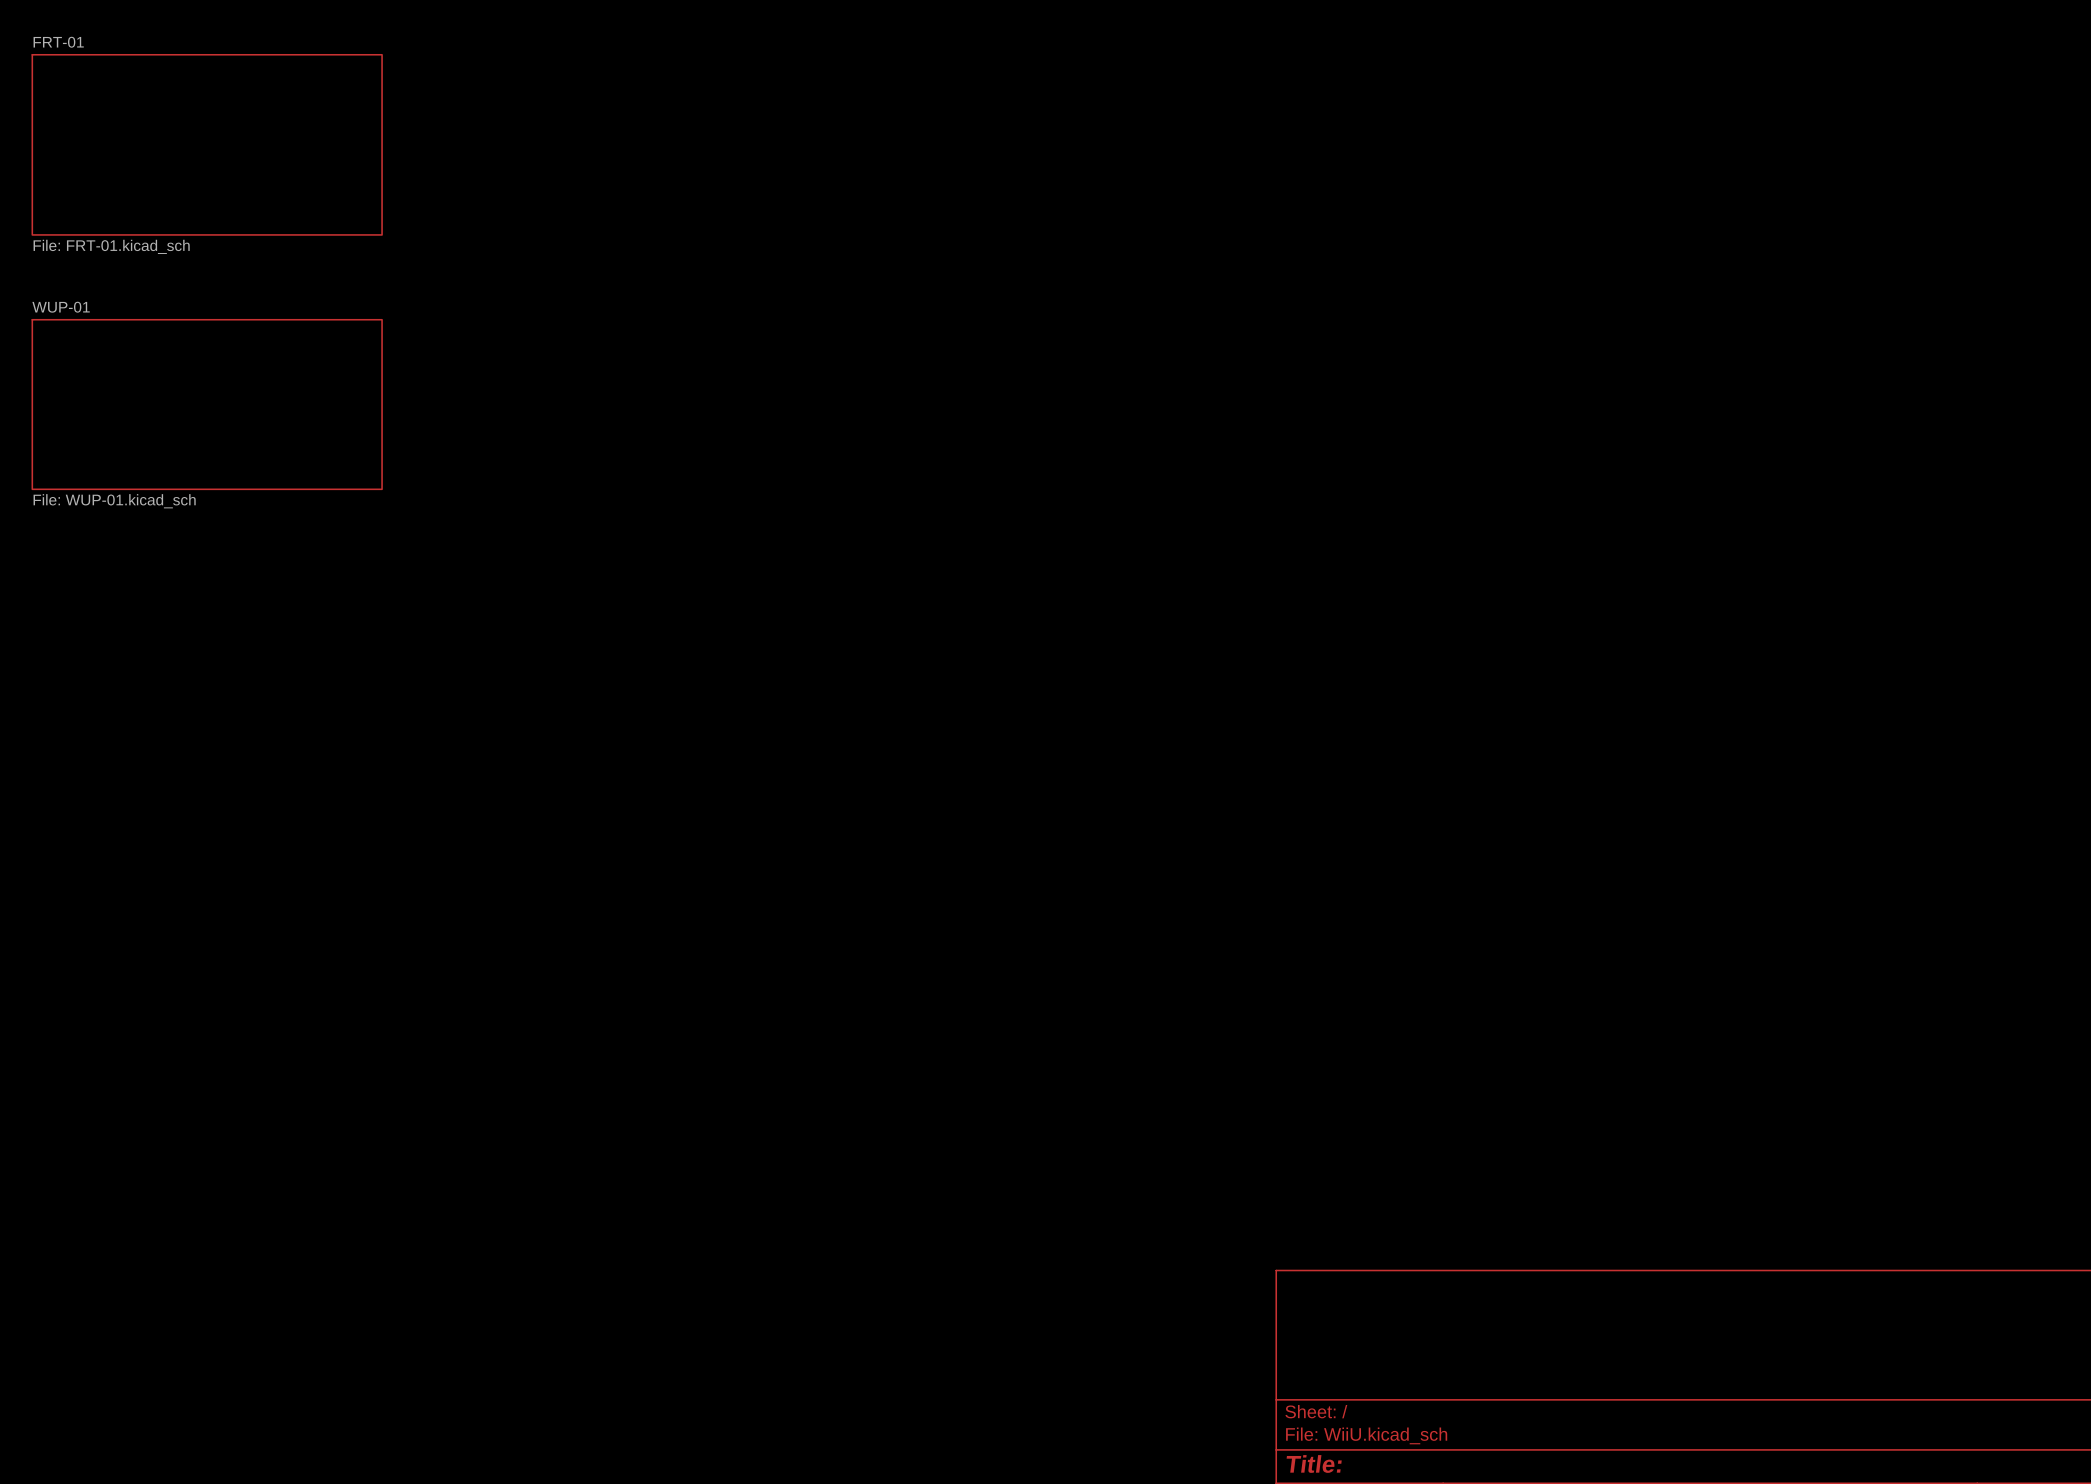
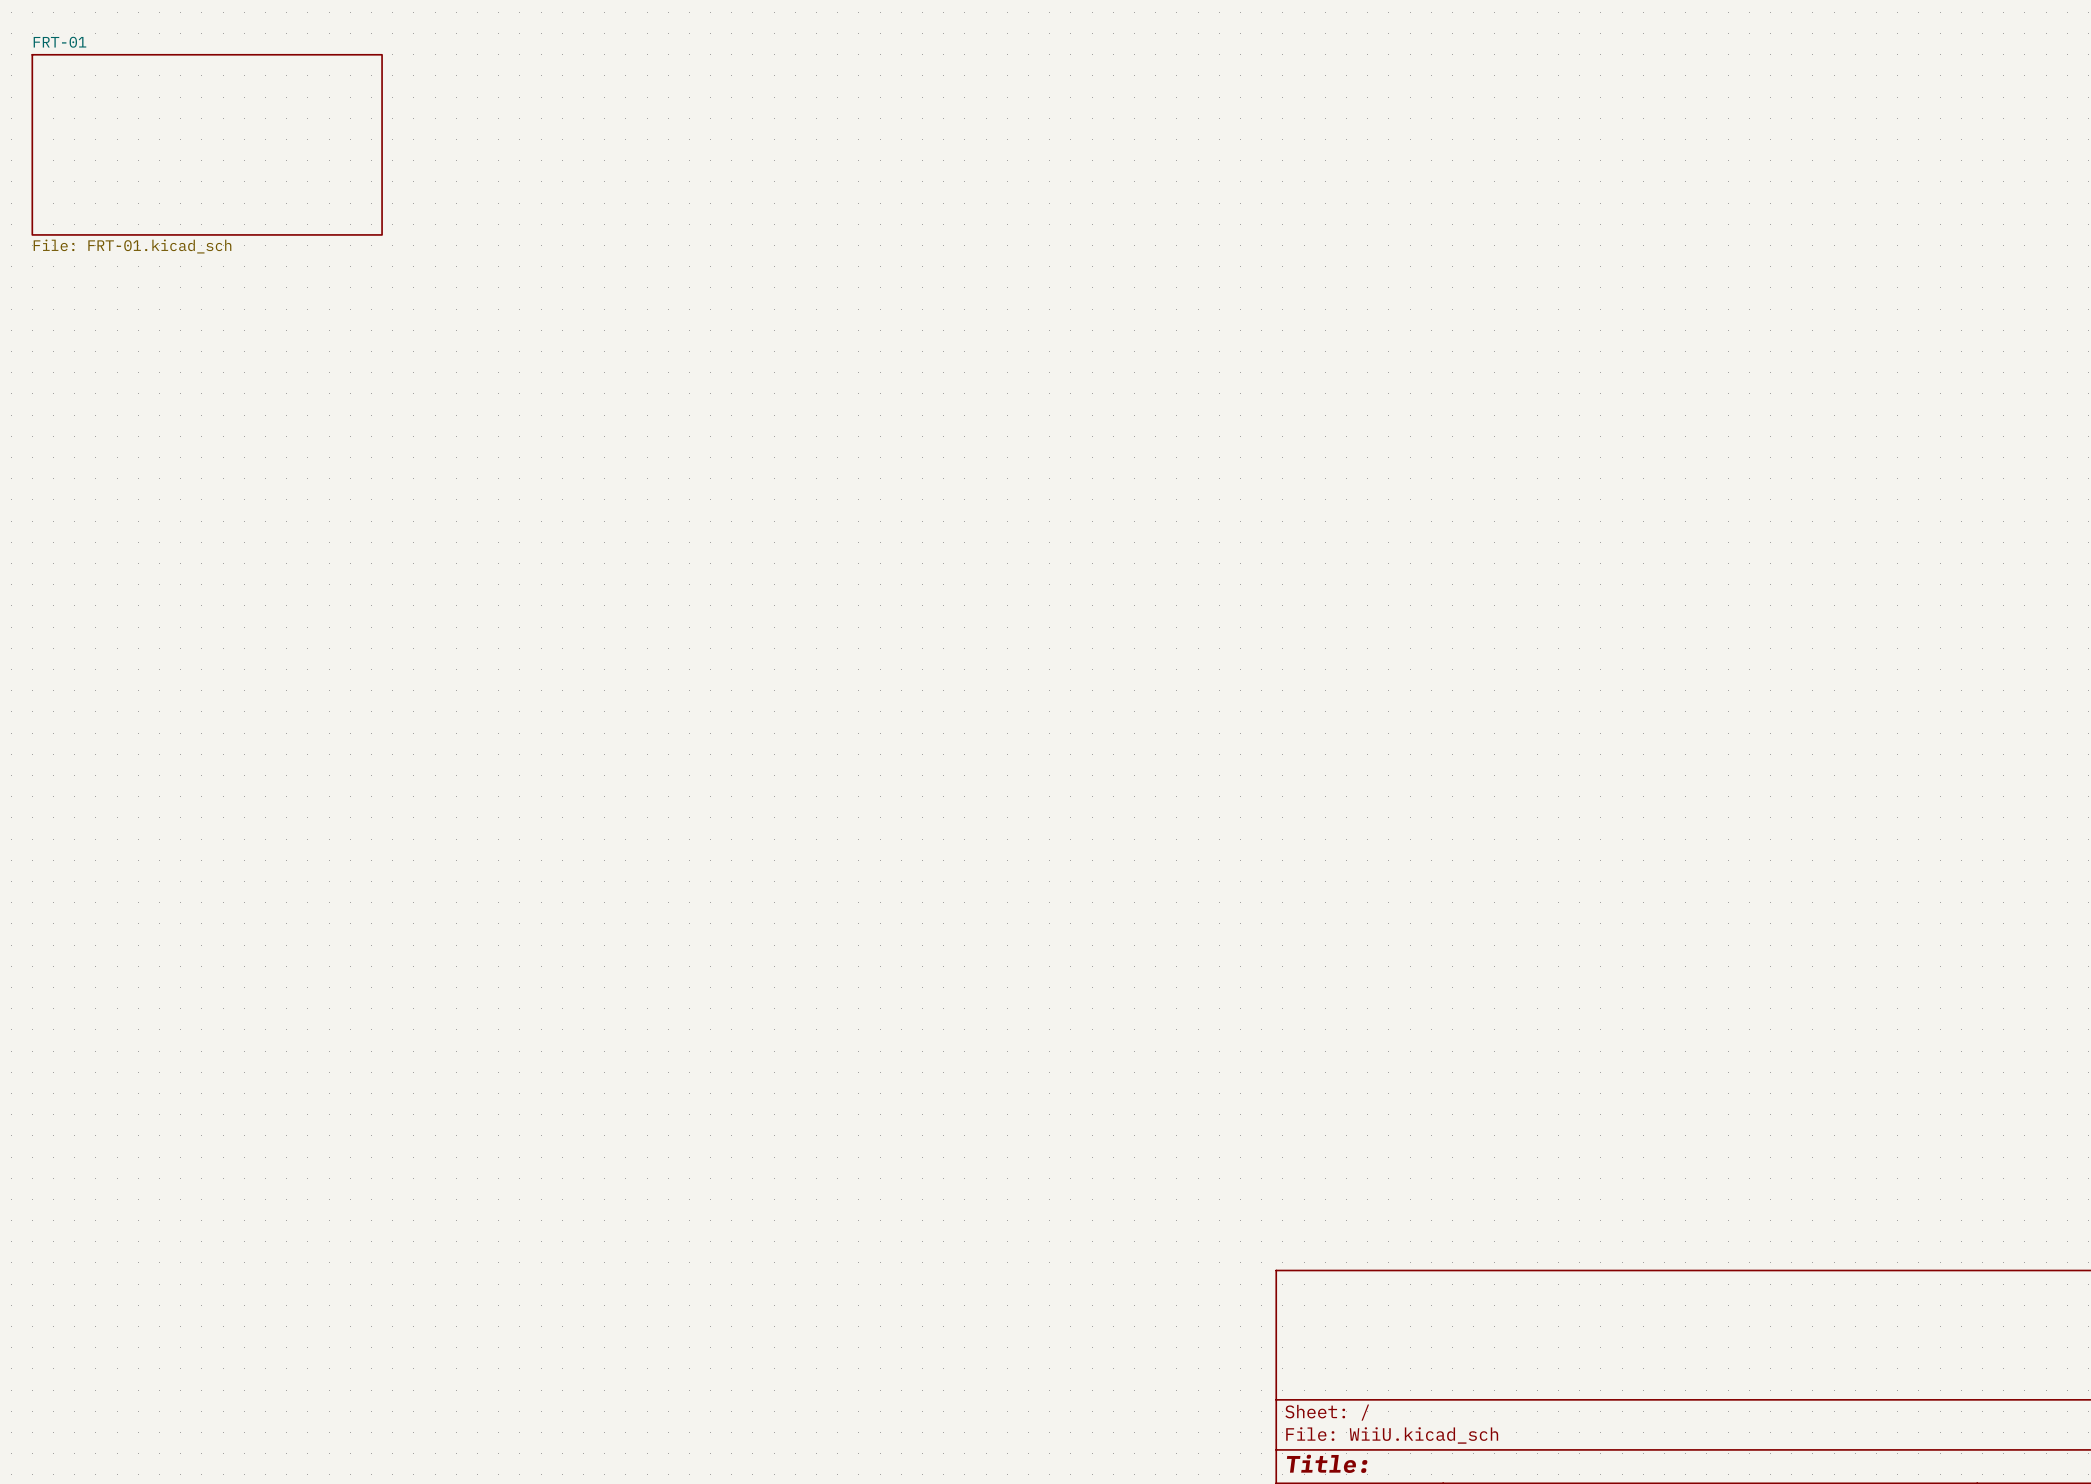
sheet WUP-01: File: WUP-01.kicad_sch (207, 404) -> none

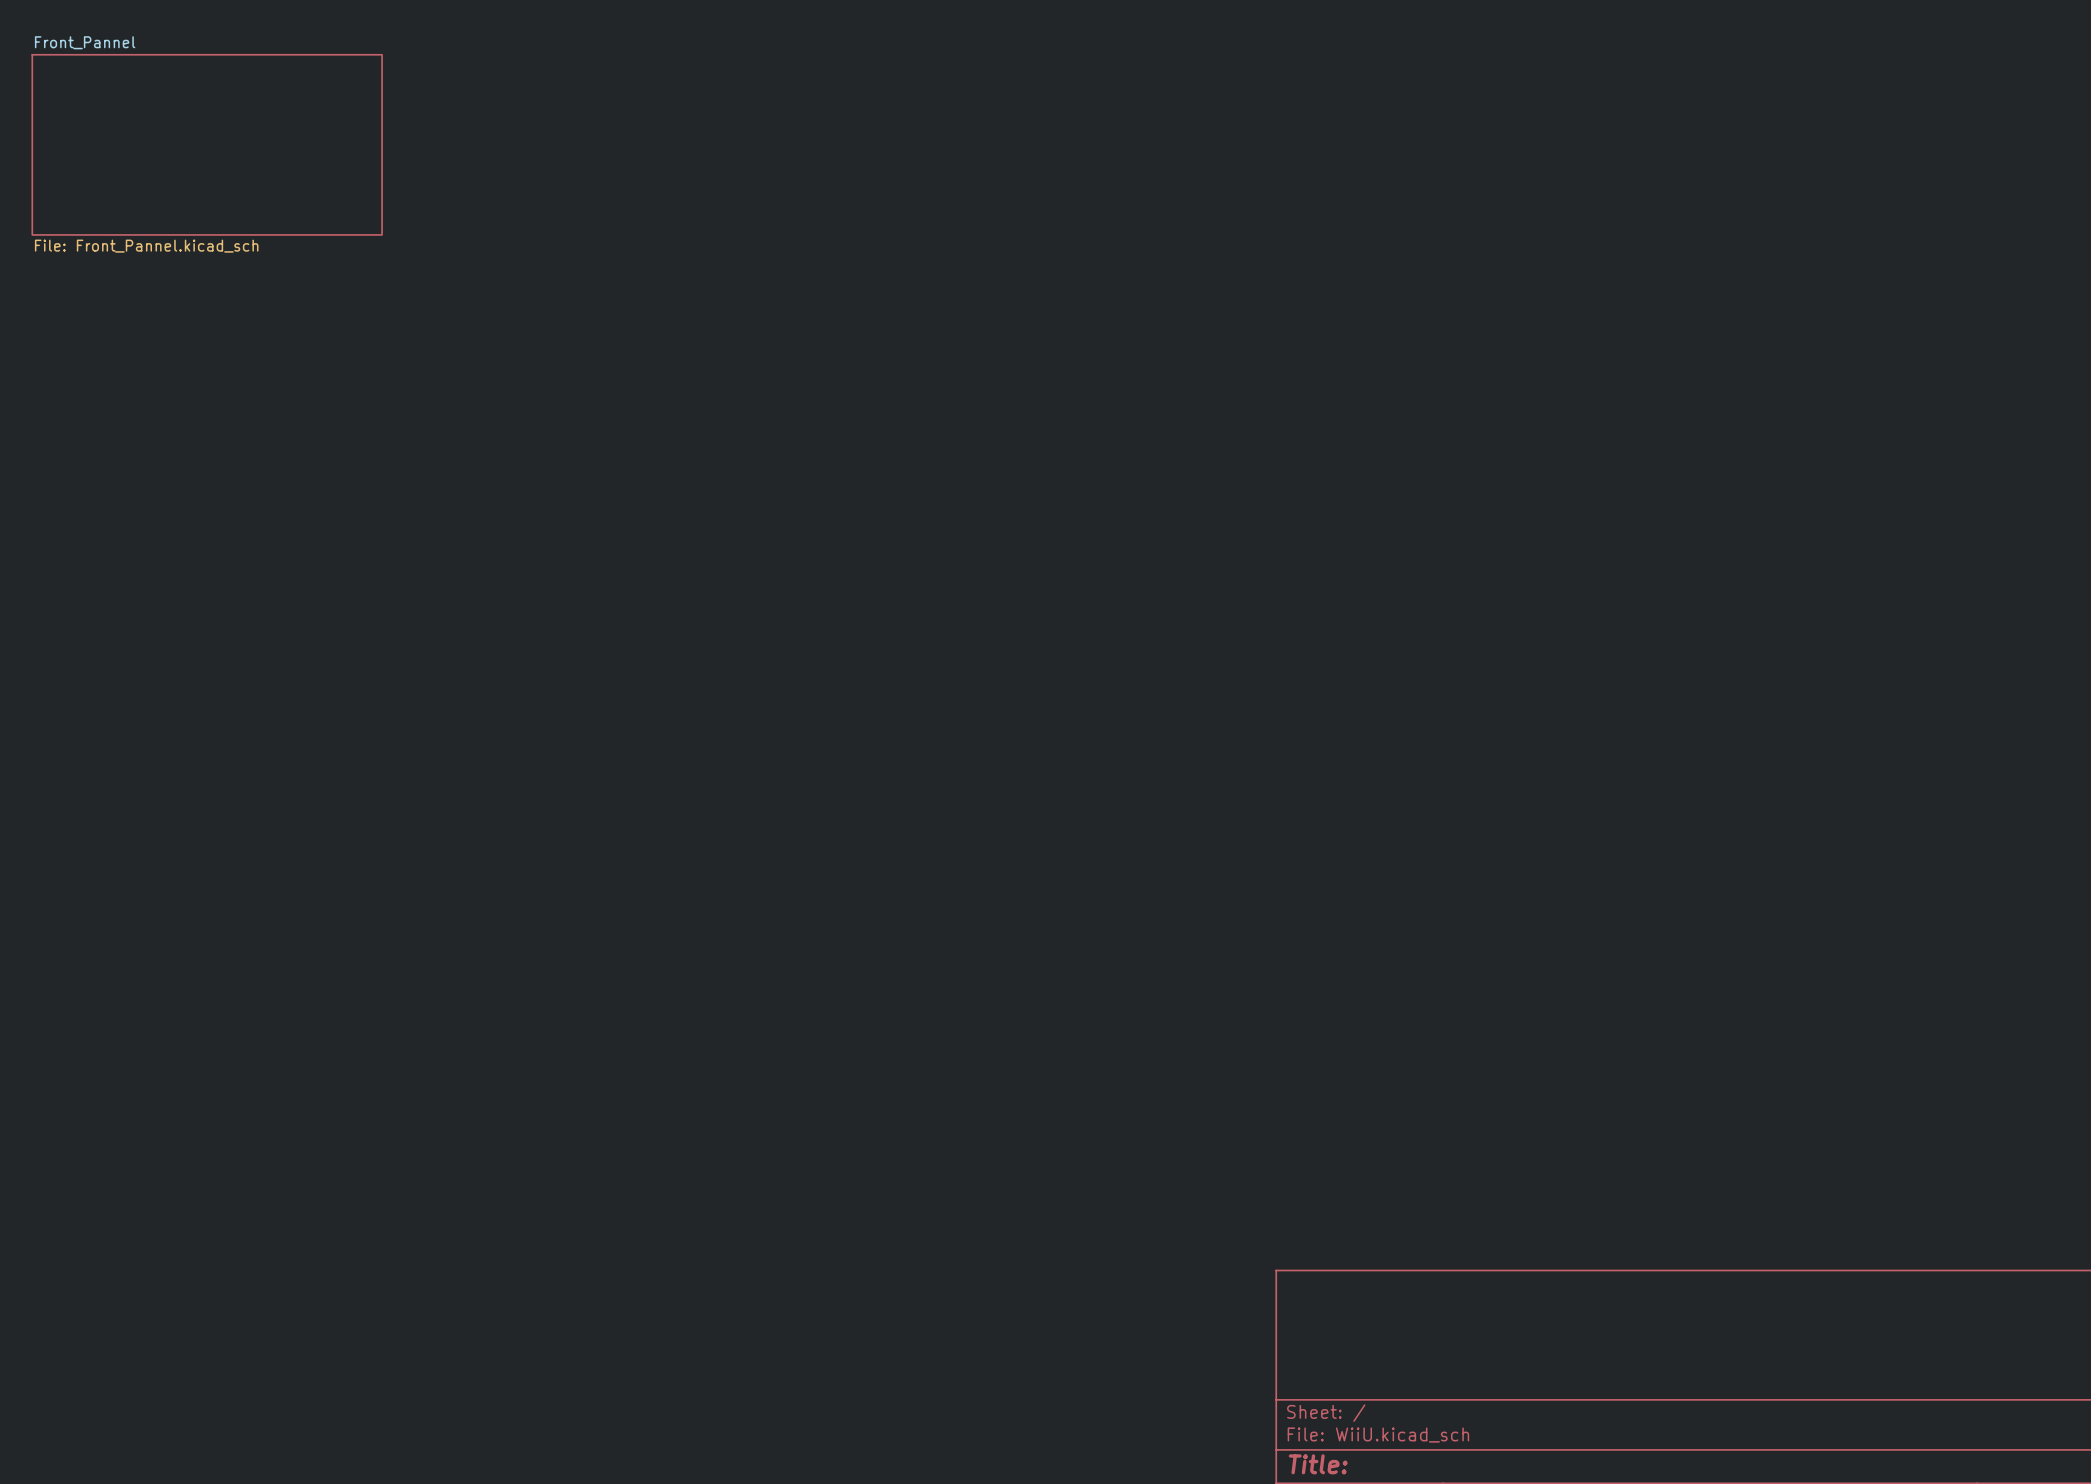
sheet FRT-01 name: FRT-01 (59, 42) -> Front_Pannel (85, 42)
sheet FRT-01 value: File: FRT-01.kicad_sch (132, 246) -> File: Front_Pannel.kicad_sch (146, 246)

